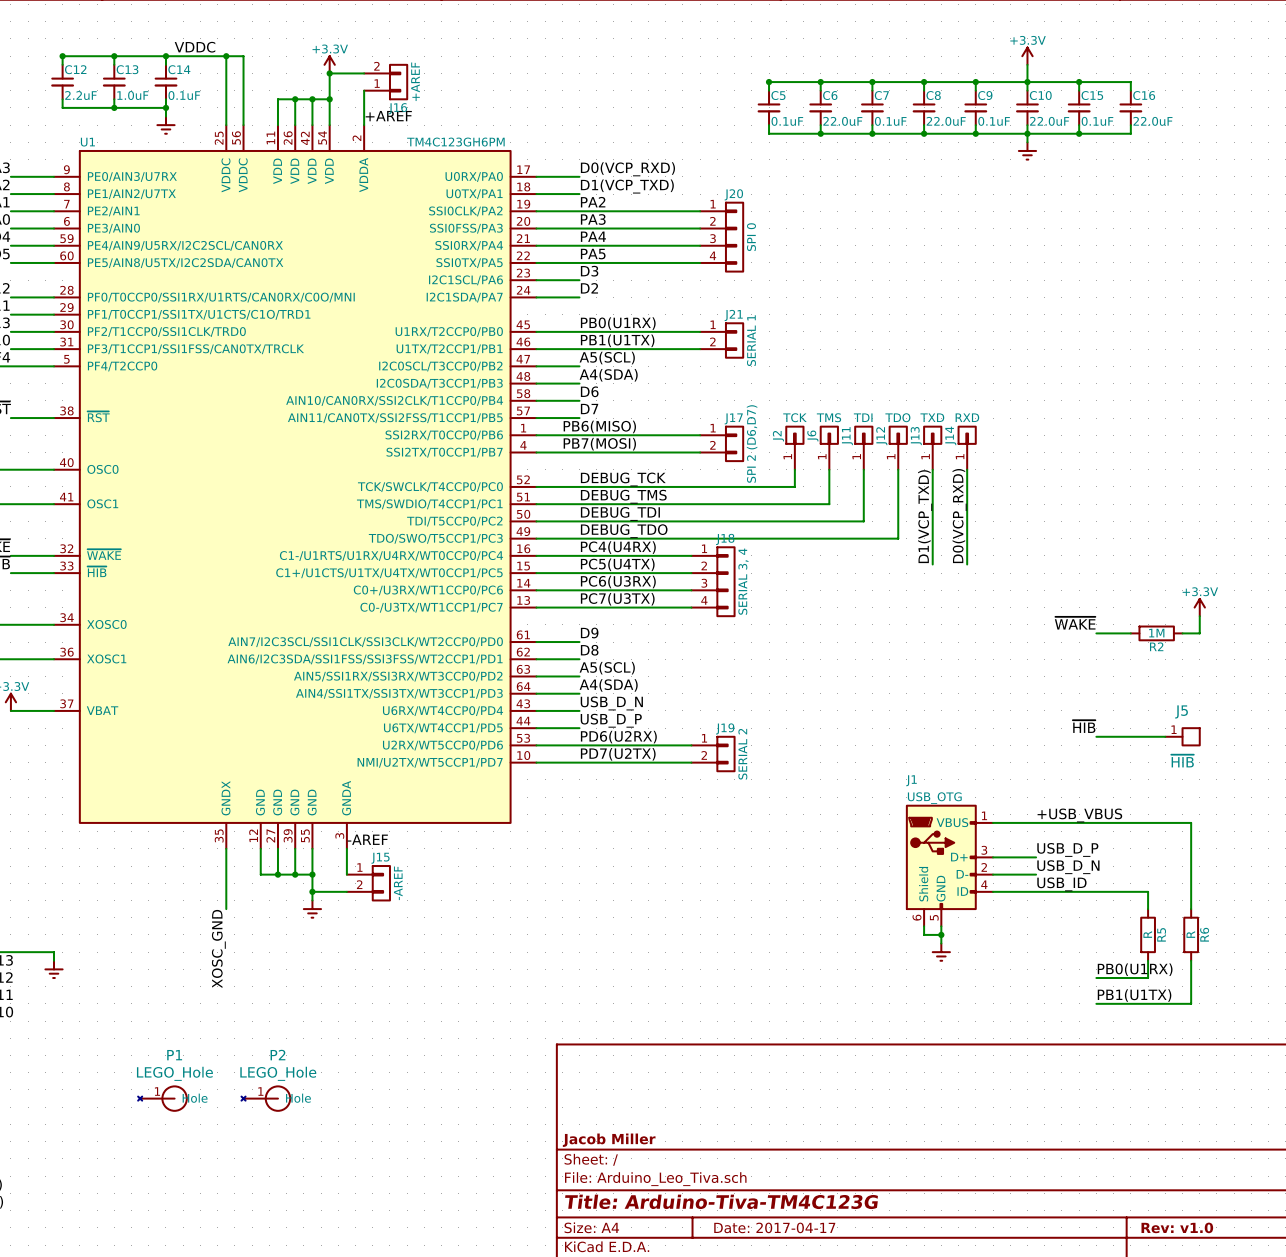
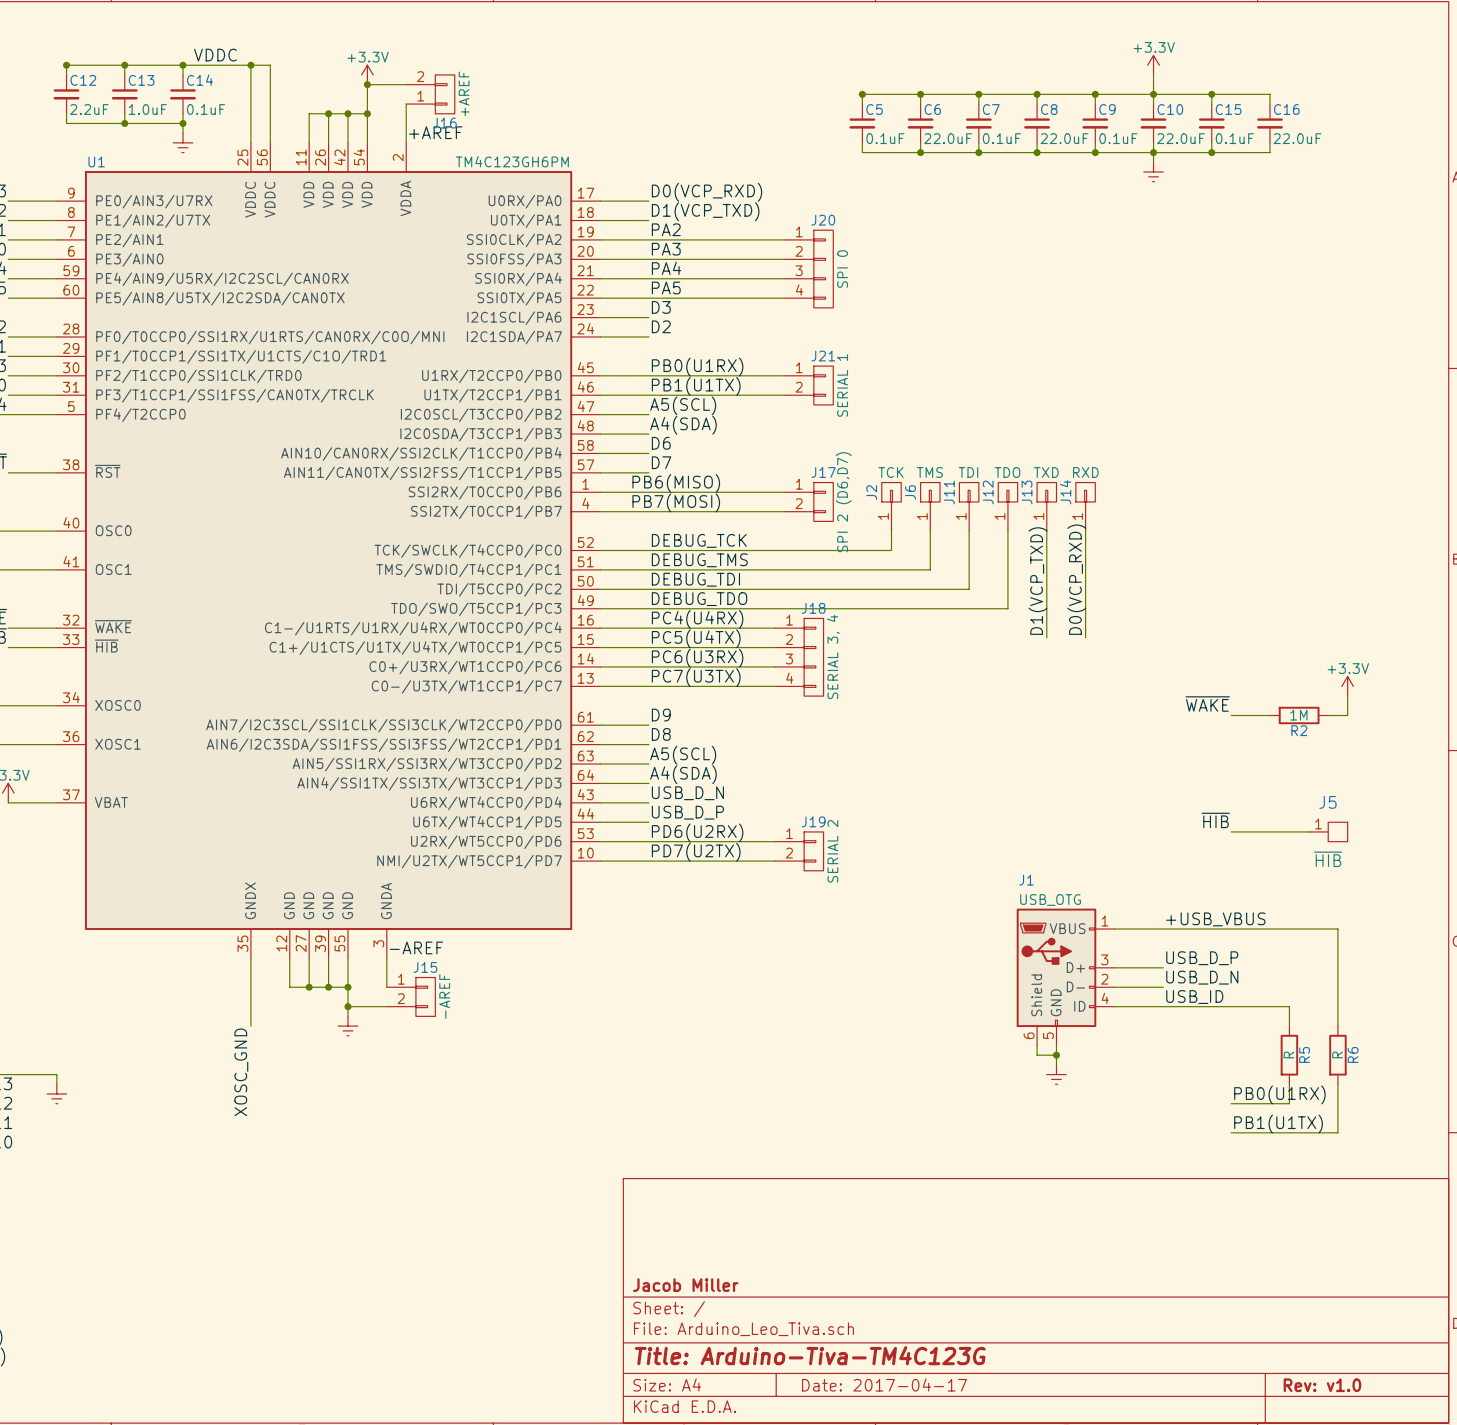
P1: LEGO_Hole (162, 1098) -> none
P2: LEGO_Hole (265, 1098) -> none

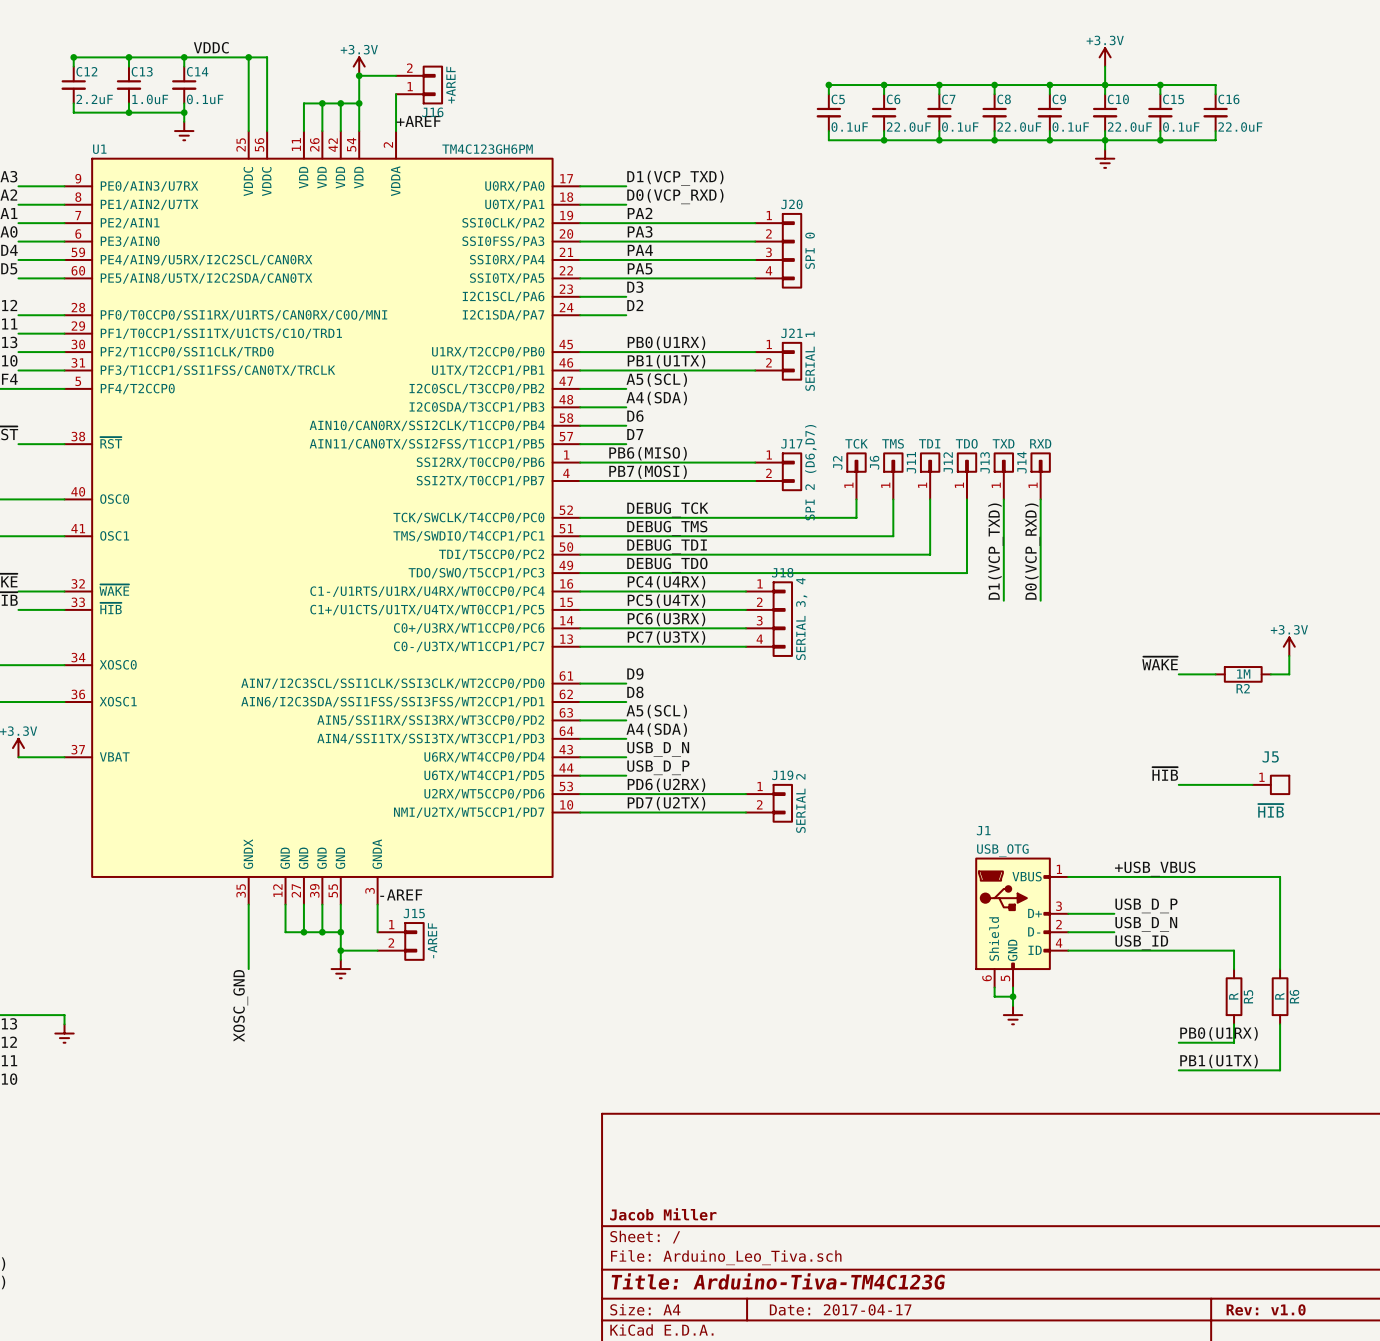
label: D0(VCP_RXD) (707, 192) -> D1(VCP_TXD) (675, 178)
label: D1(VCP_TXD) (705, 211) -> D0(VCP_RXD) (675, 196)

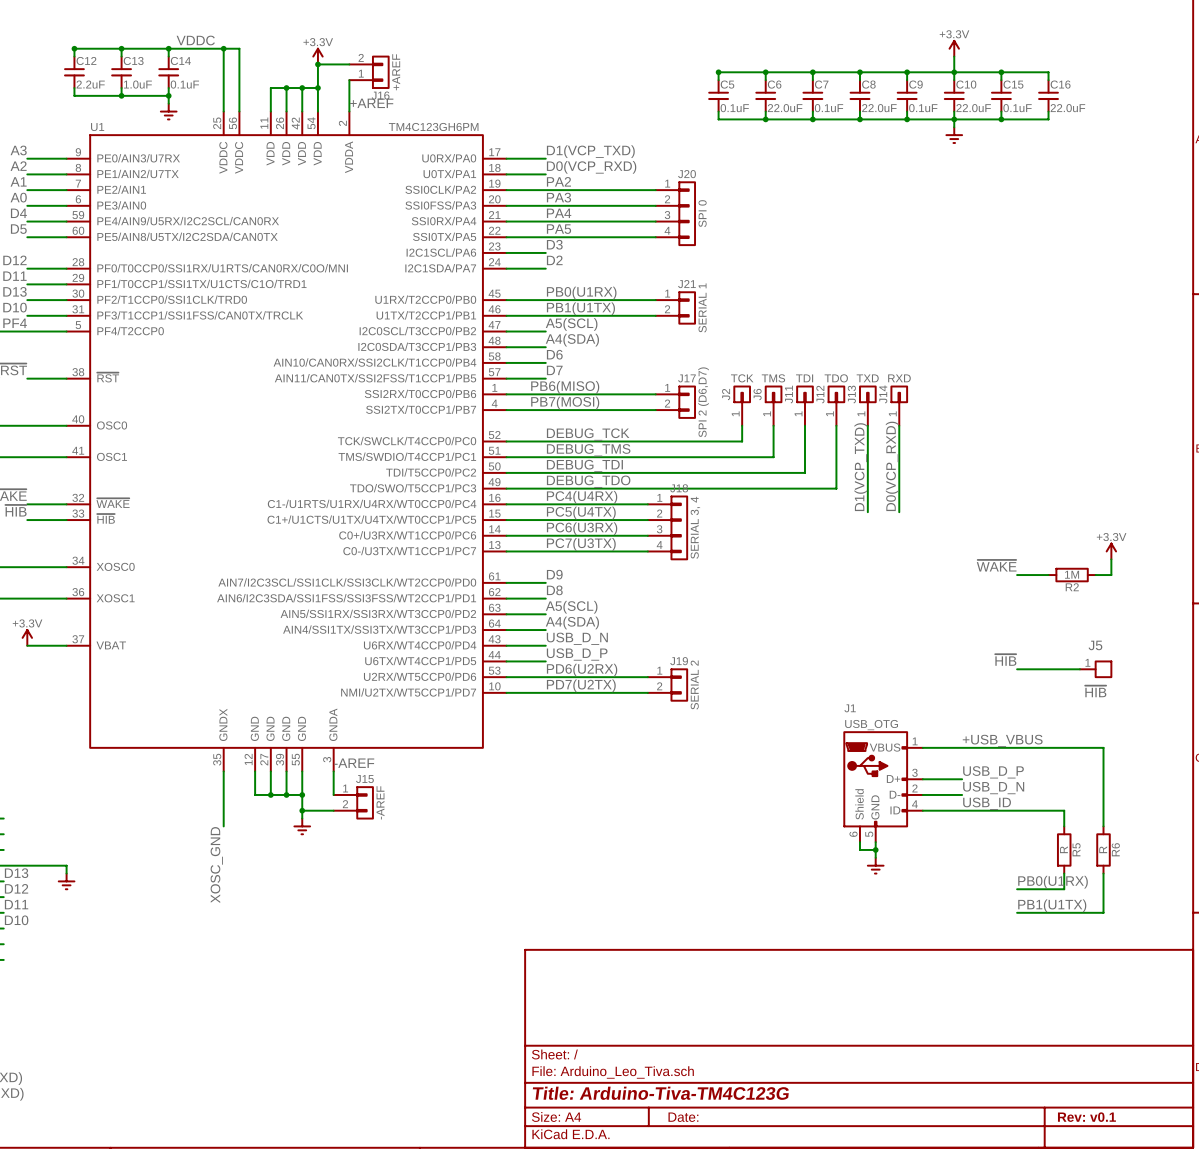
title block: Jacob Miller (663, 1214) -> none
title block: Date: 2017-04-17 (840, 1309) -> Date: (683, 1117)
title block: Rev: v1.0 (1266, 1309) -> Rev: v0.1 (1086, 1117)

